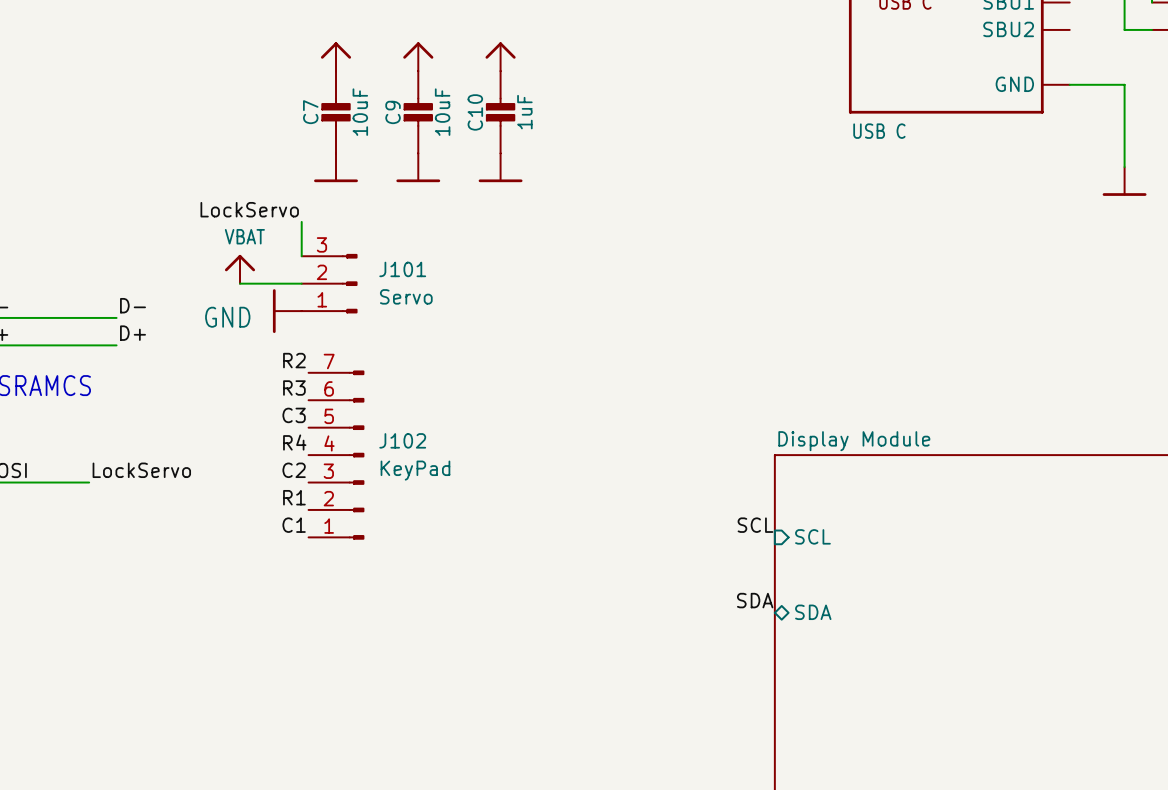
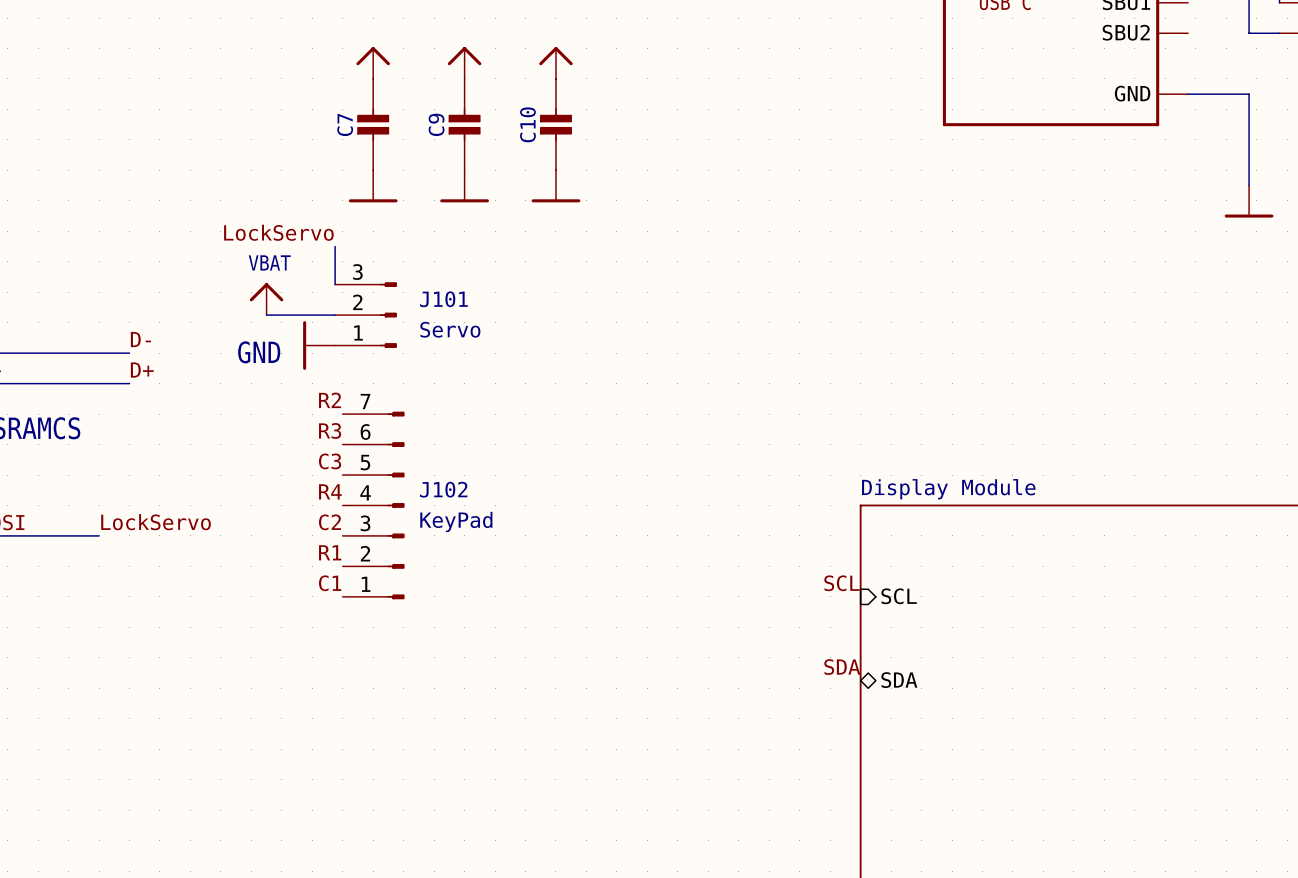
C7 value: 10uF (360, 112) -> none
C9 value: 10uF (442, 112) -> none
C10 value: 1uF (524, 112) -> none
part value: USB C (879, 131) -> none

